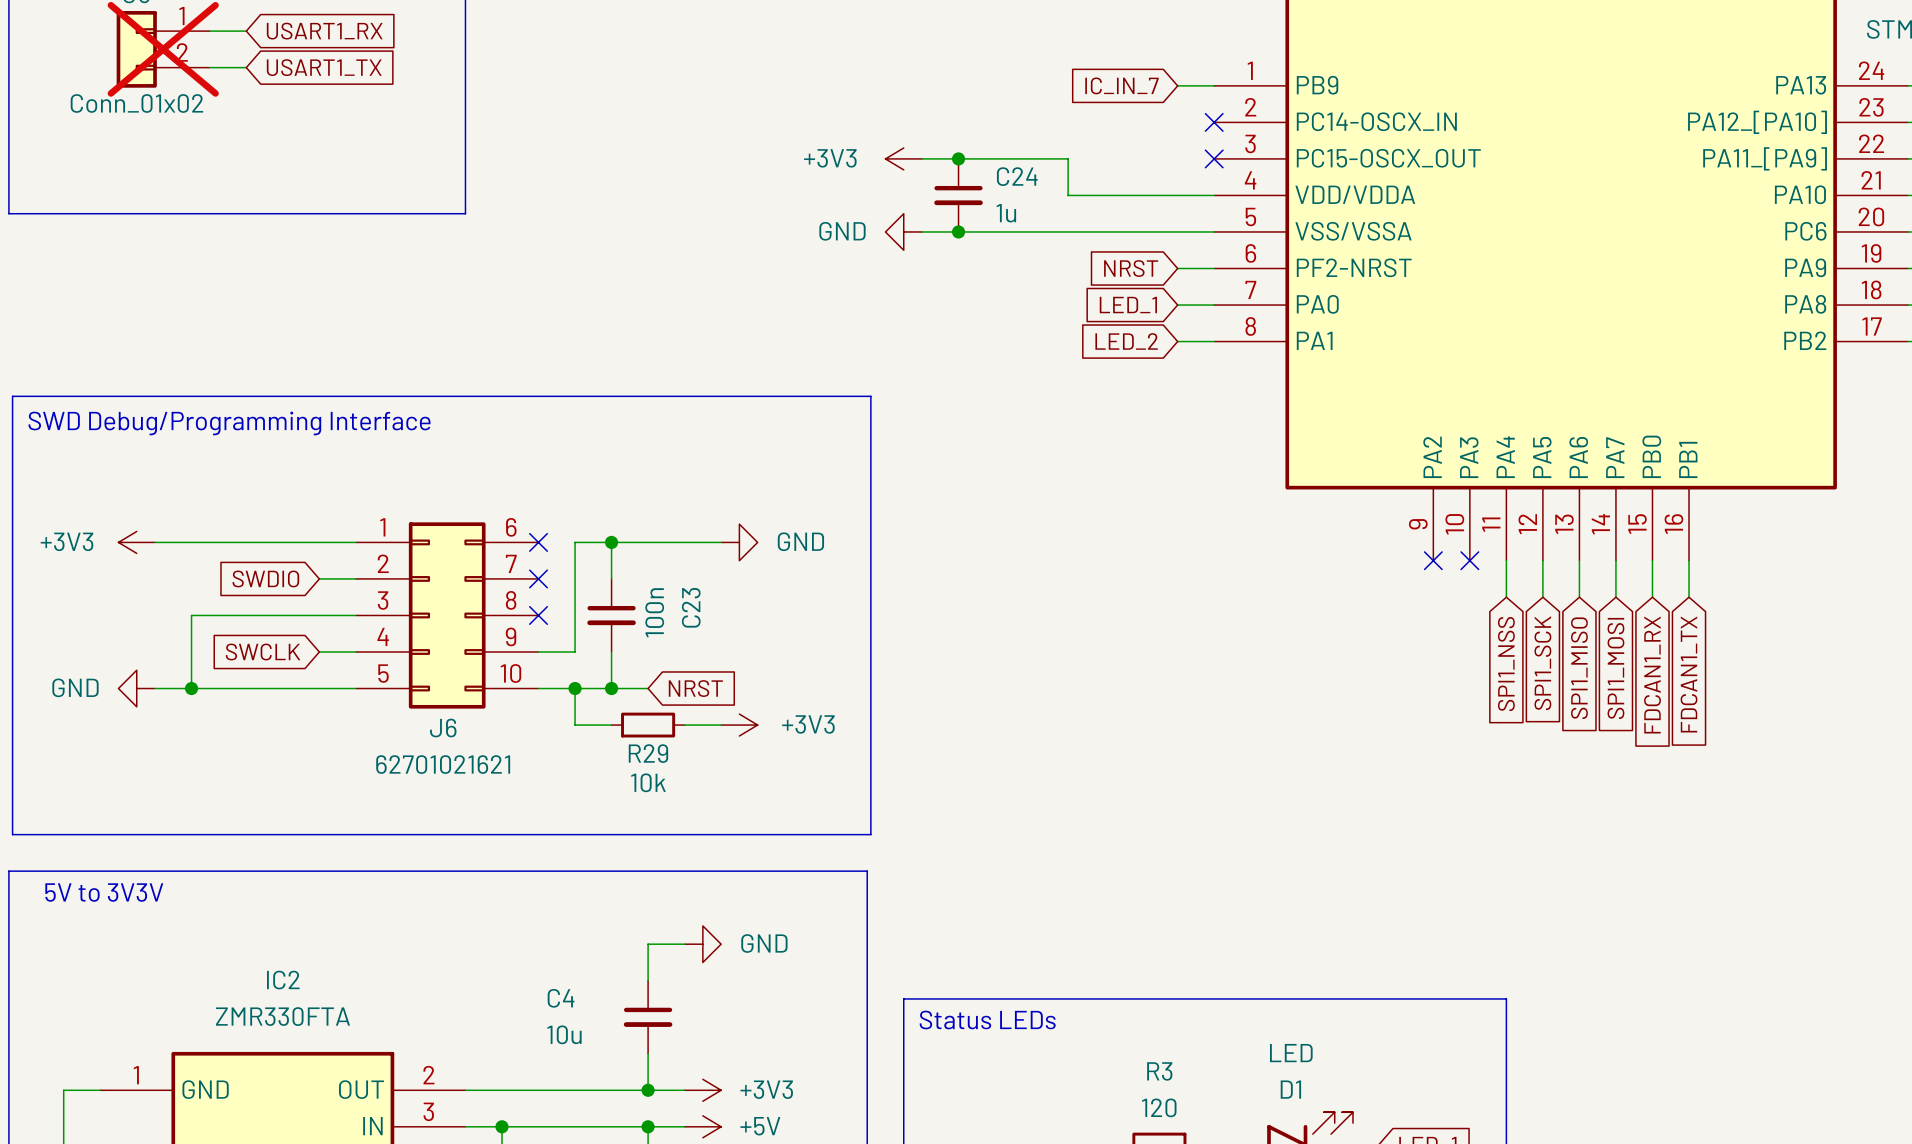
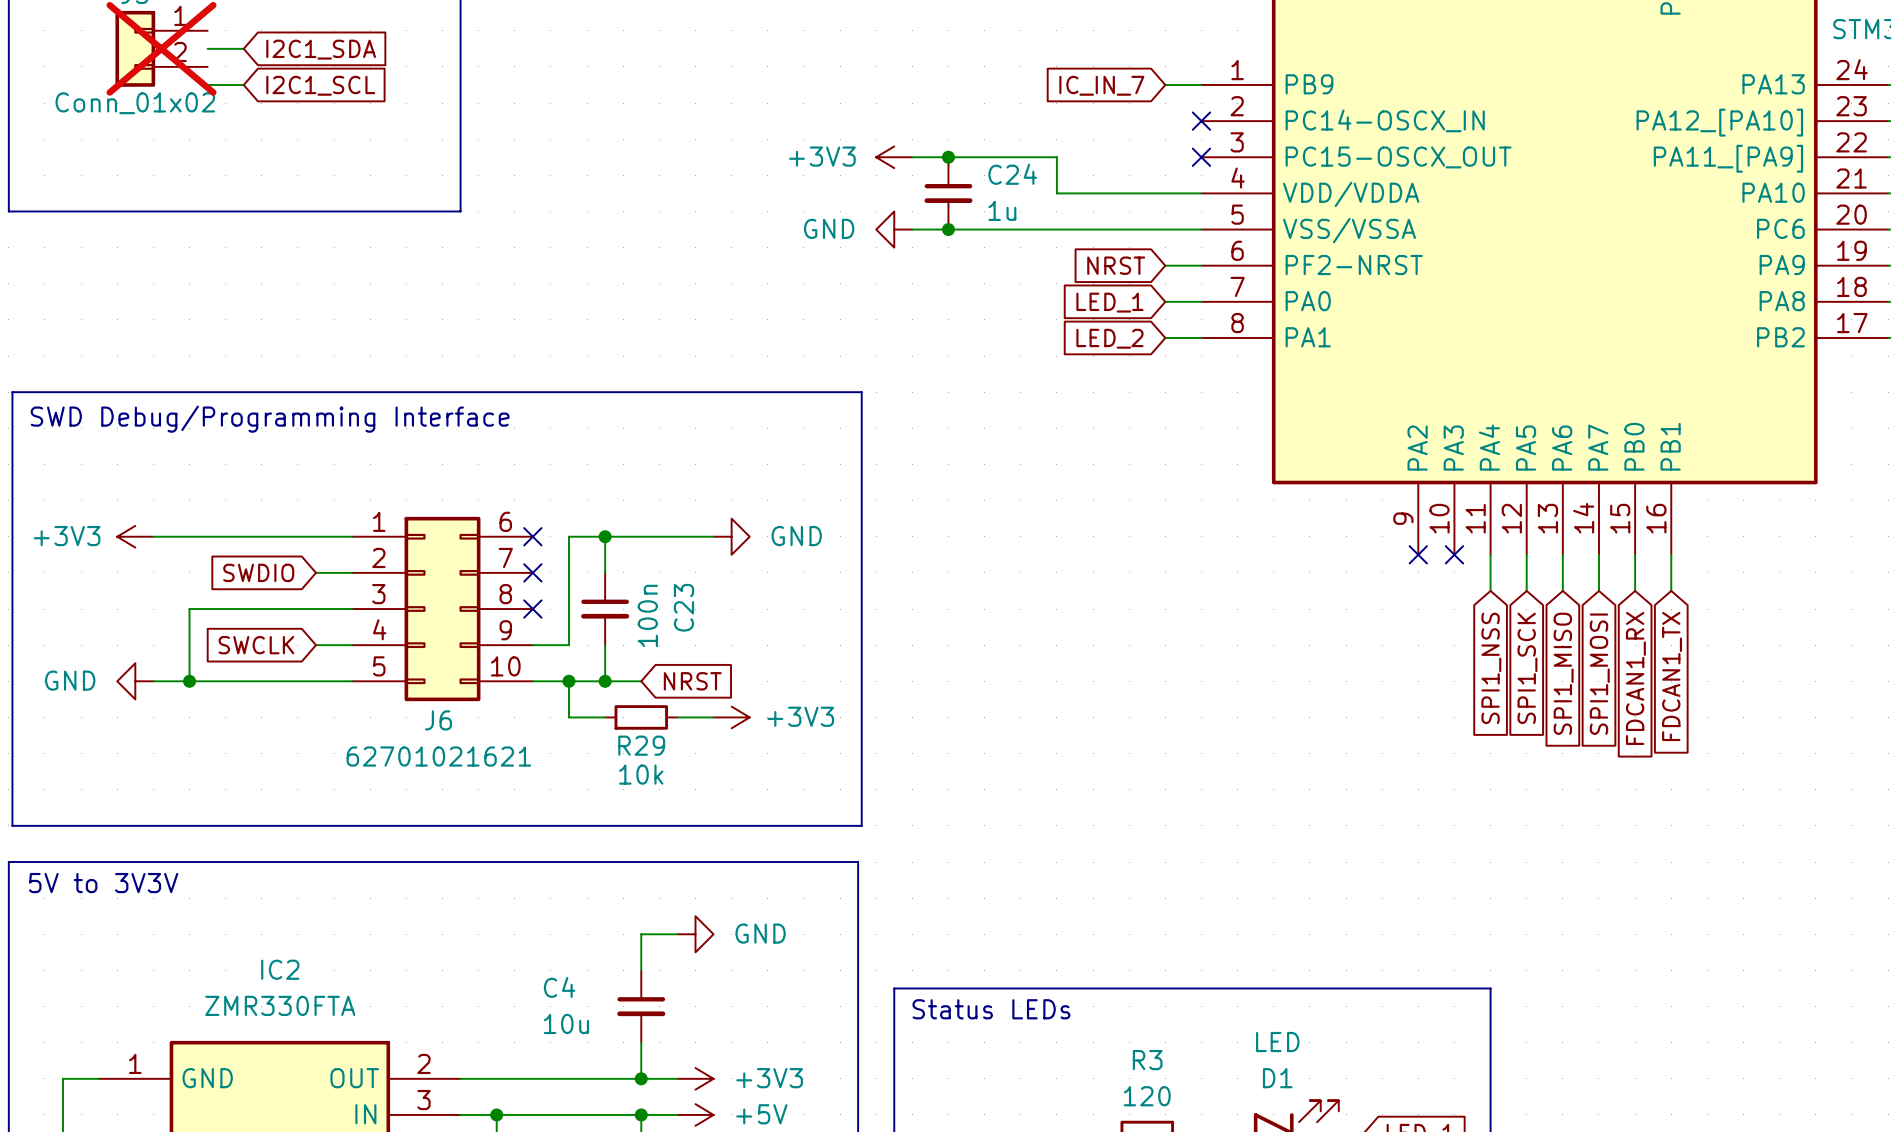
wire: (209, 31) (246, 31) -> (207, 48) (243, 48)
global label: USART1_RX (324, 31) -> none
global label: none -> I2C1_SDA (321, 49)
wire: (209, 67) (246, 67) -> (207, 84) (243, 84)
global label: USART1_TX (324, 67) -> none
global label: none -> I2C1_SCL (320, 85)

